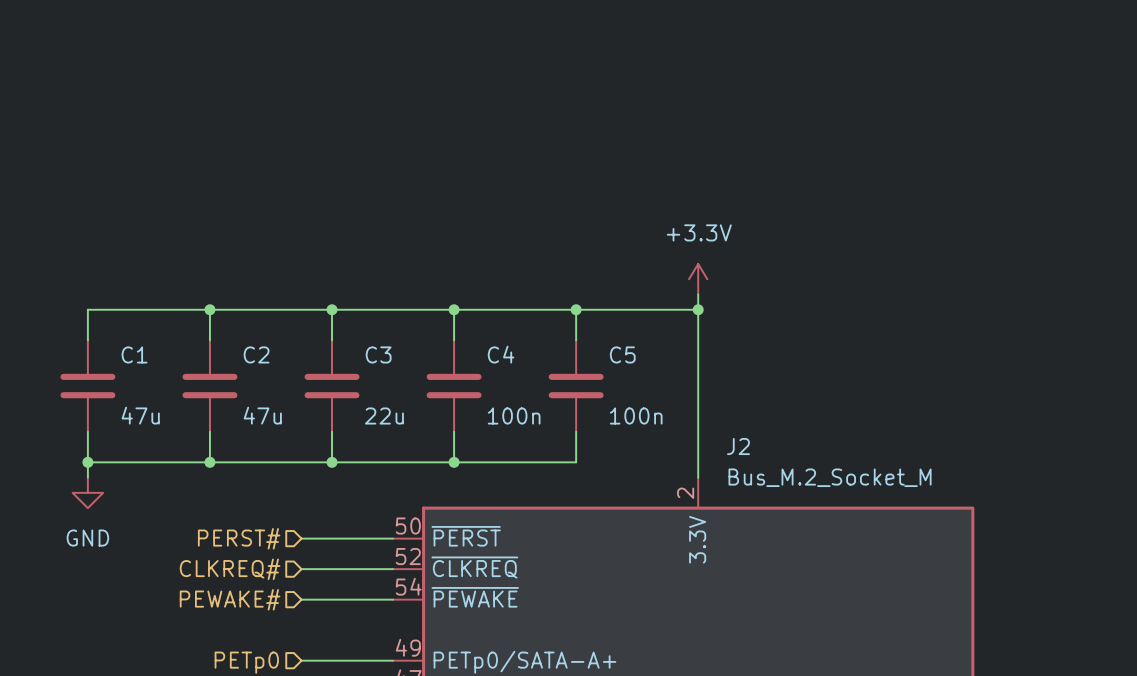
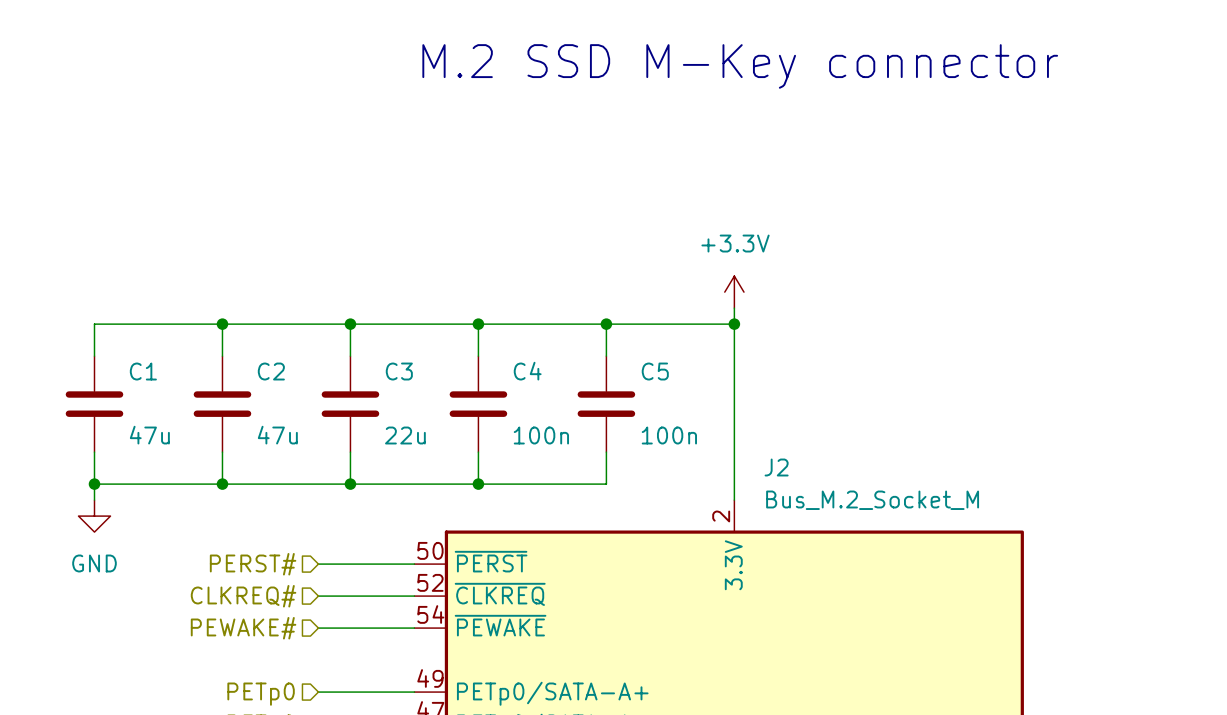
text: none -> M.2 SSD M-Key connector (740, 66)

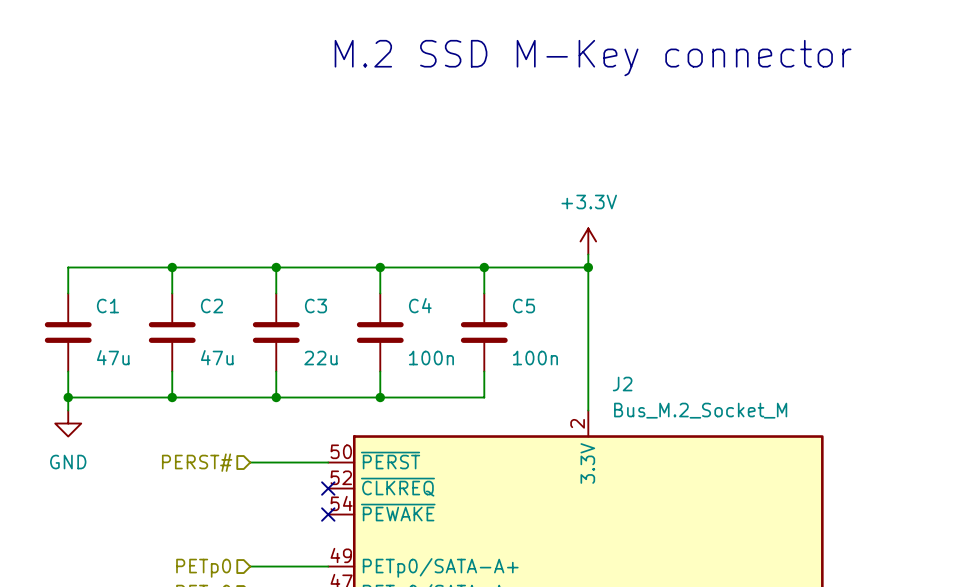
hierarchical label: CLKREQ# (243, 596) -> none
wire: (318, 596) (414, 596) -> none
no-connect mark: none -> (328, 488)
hierarchical label: PEWAKE# (243, 628) -> none
wire: (318, 628) (414, 628) -> none
no-connect mark: none -> (328, 514)

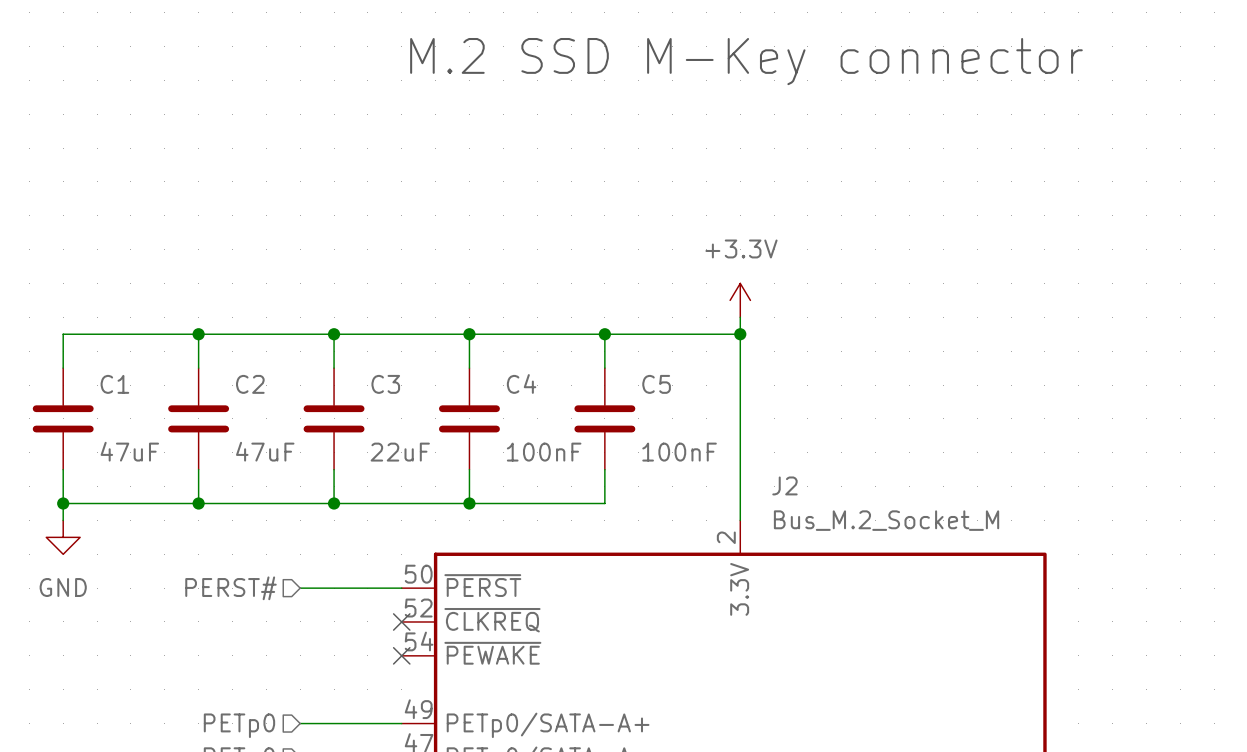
C1 value: 47u (113, 357) -> 47uF (129, 451)
C2 value: 47u (217, 357) -> 47uF (265, 451)
C3 value: 22u (320, 358) -> 22uF (400, 452)
C4 value: 100n (431, 358) -> 100nF (544, 452)
C5 value: 100n (535, 358) -> 100nF (679, 452)

